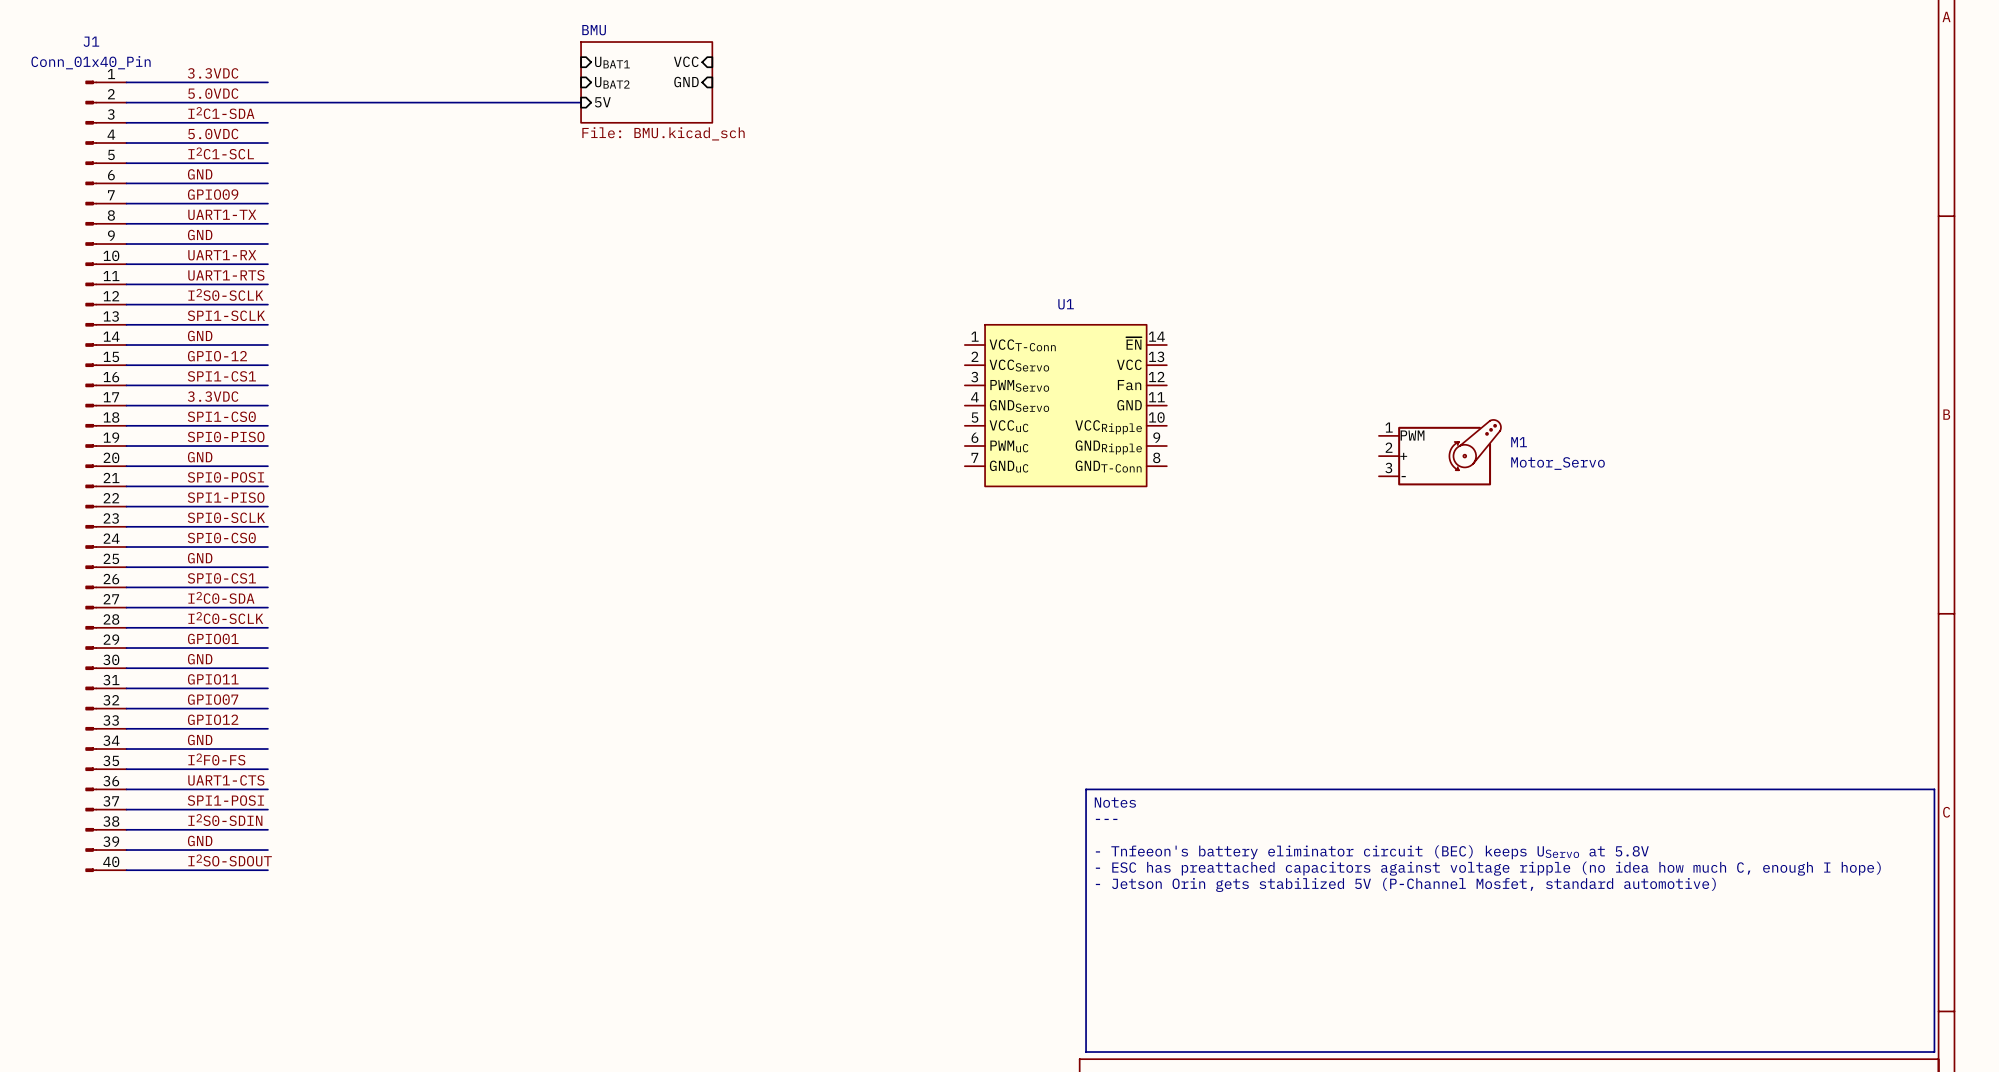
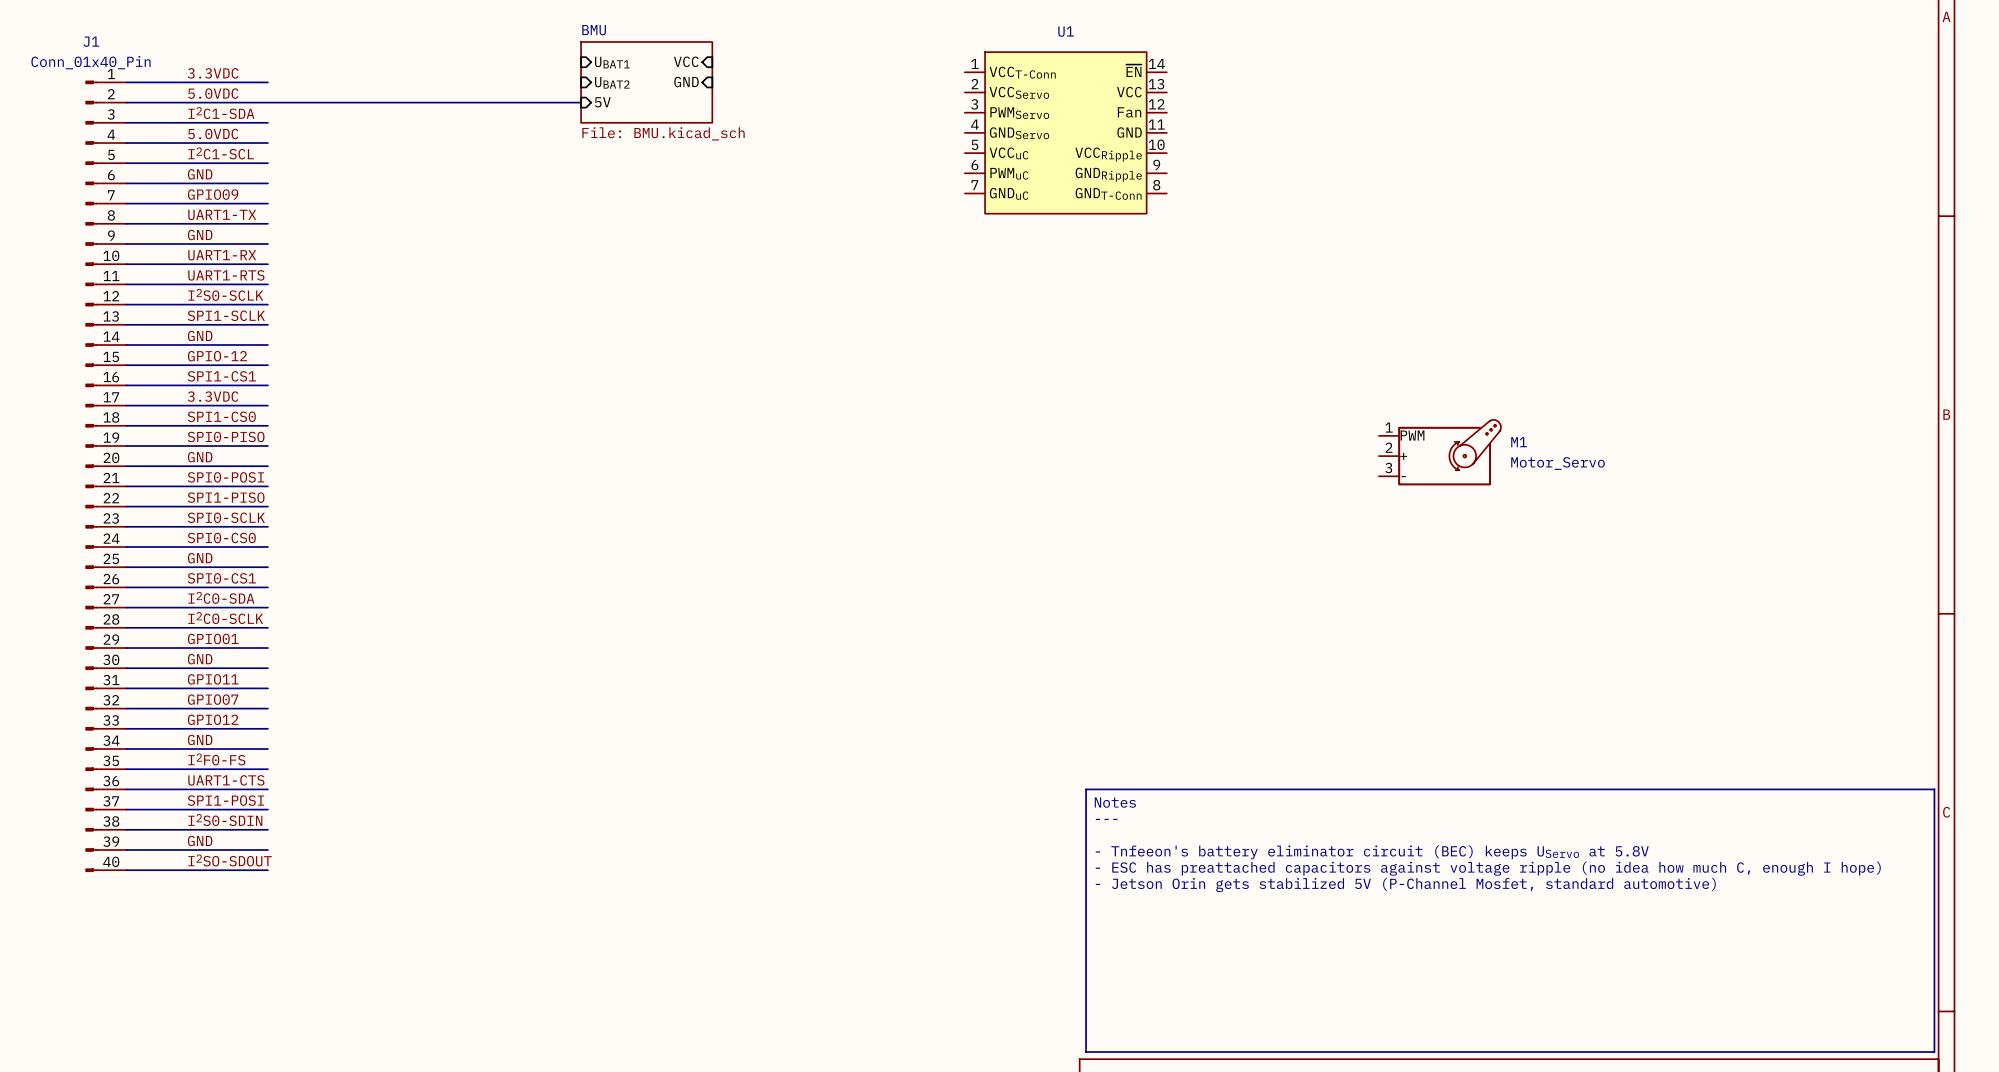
U1 position: (1065, 405) -> (1065, 132)

